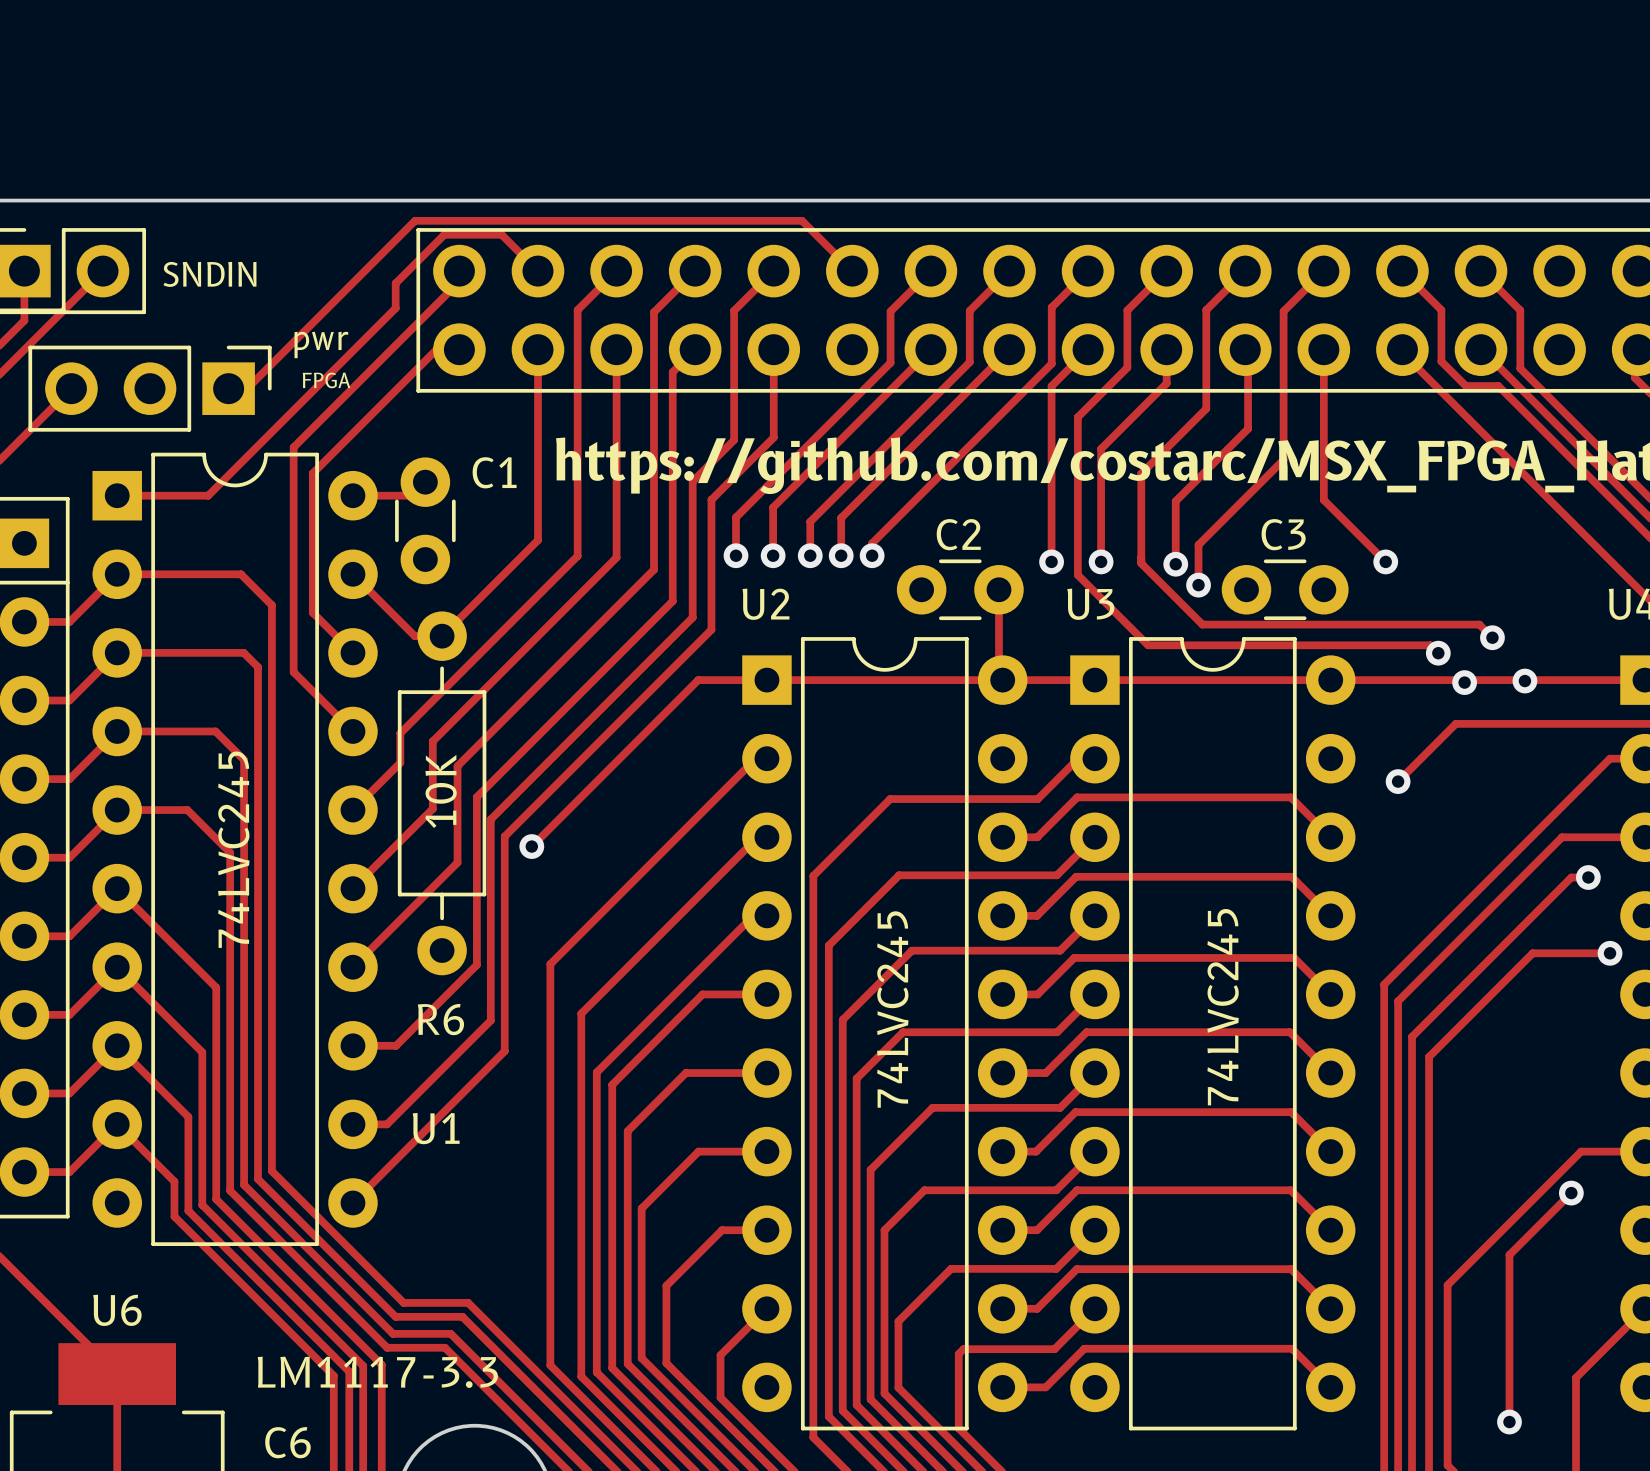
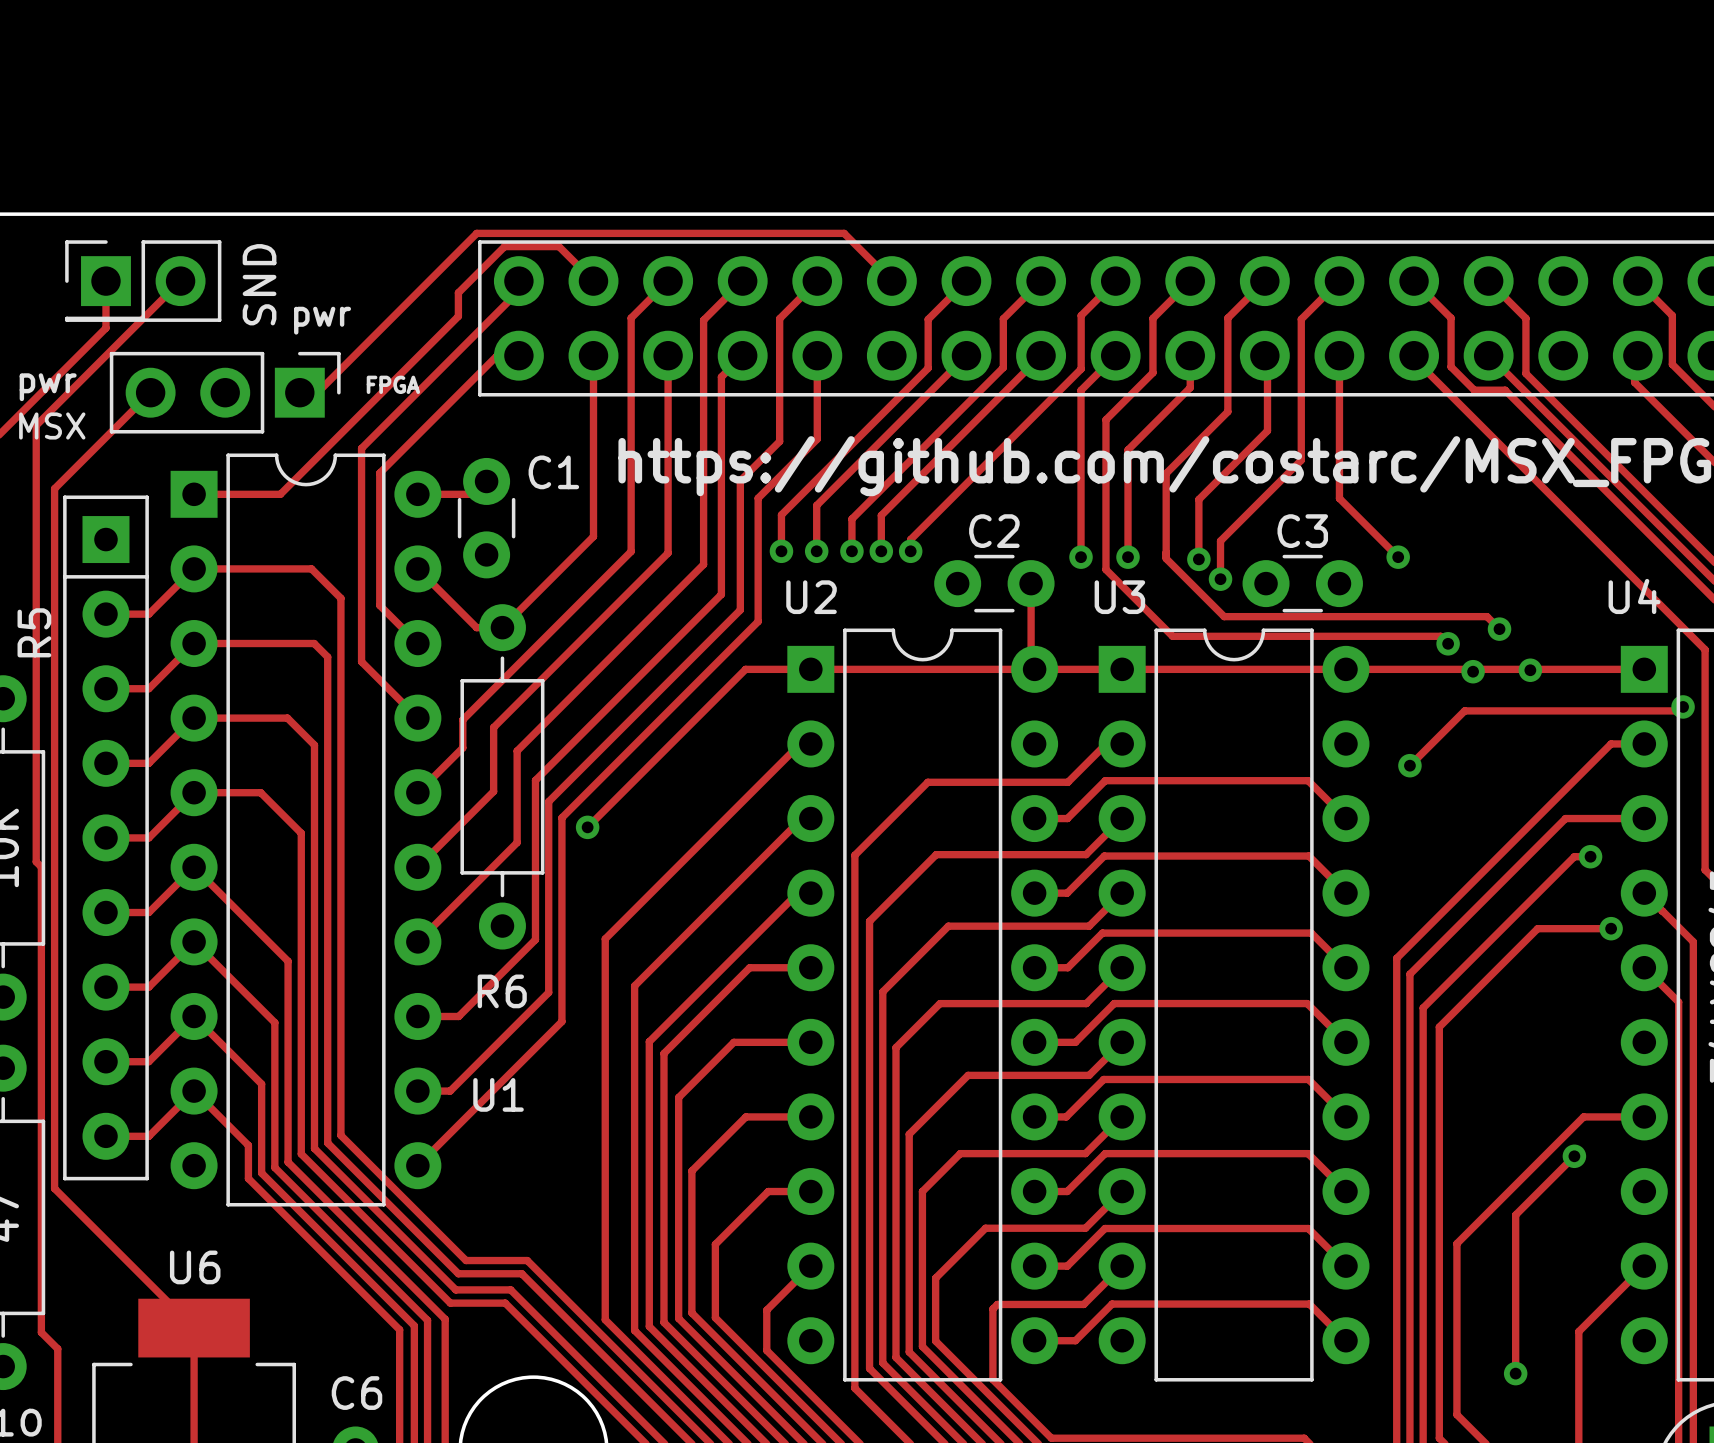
part value: none -> SND (259, 284)
text: SNDIN (209, 274) -> none
text position: pwr (321, 345) -> pwr (322, 320)
R6 value: 10K (441, 791) -> none
U1 value: 74LVC245 (233, 849) -> none
U3 value: 74LVC245 (1223, 1007) -> none
U2 value: 74LVC245 (892, 1009) -> none
U6 value: LM1117-3.3 (377, 1372) -> none

